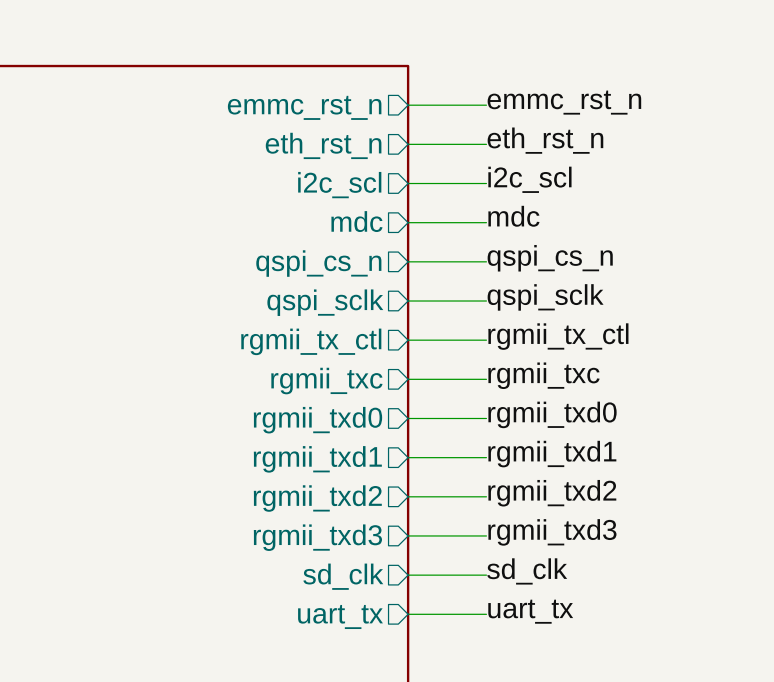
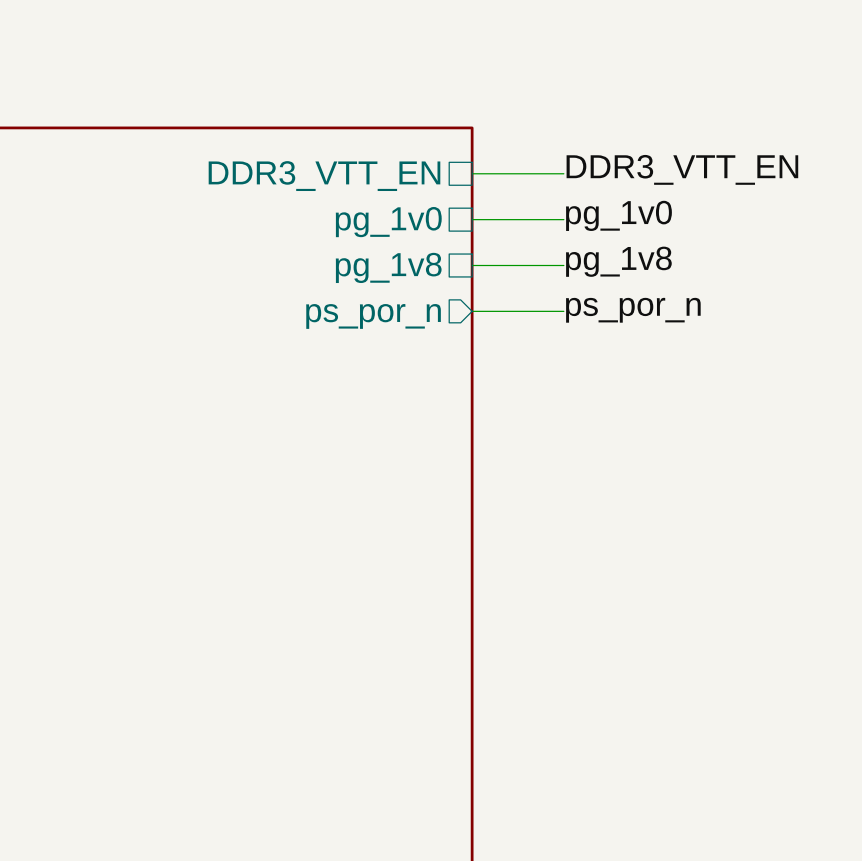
label: emmc_rst_n (564, 102) -> DDR3_VTT_EN (682, 169)
sheet pin shape: output (304, 107) -> passive (324, 176)
sheet pin: emmc_rst_n (304, 107) -> DDR3_VTT_EN (324, 176)
label: eth_rst_n (545, 140) -> pg_1v0 (618, 215)
sheet pin shape: output (323, 145) -> passive (388, 222)
sheet pin: eth_rst_n (323, 145) -> pg_1v0 (388, 222)
label: i2c_scl (529, 179) -> pg_1v8 (618, 261)
sheet pin shape: output (339, 185) -> passive (388, 267)
sheet pin: i2c_scl (339, 185) -> pg_1v8 (388, 267)
label: mdc (513, 216) -> ps_por_n (633, 310)
sheet pin: mdc (356, 221) -> ps_por_n (373, 316)
label: qspi_cs_n (550, 258) -> none
wire: (408, 261) (486, 261) -> none
sheet pin: qspi_cs_n (318, 263) -> none
label: qspi_sclk (545, 297) -> none
wire: (408, 301) (486, 301) -> none
sheet pin: qspi_sclk (325, 302) -> none
label: rgmii_tx_ctl (558, 336) -> none
wire: (408, 340) (486, 340) -> none
sheet pin: rgmii_tx_ctl (311, 341) -> none
label: rgmii_txc (543, 375) -> none
wire: (408, 379) (486, 379) -> none
sheet pin: rgmii_txc (326, 381) -> none
label: rgmii_txd0 (552, 414) -> none
wire: (408, 418) (486, 418) -> none
sheet pin: rgmii_txd0 (317, 420) -> none
label: rgmii_txd1 (552, 454) -> none
wire: (408, 457) (486, 457) -> none
sheet pin: rgmii_txd1 (317, 459) -> none
label: rgmii_txd2 (552, 493) -> none
wire: (408, 496) (486, 496) -> none
sheet pin: rgmii_txd2 (317, 498) -> none
label: rgmii_txd3 (552, 532) -> none
wire: (408, 535) (486, 535) -> none
sheet pin: rgmii_txd3 (317, 537) -> none
label: sd_clk (527, 571) -> none
wire: (408, 575) (486, 575) -> none
sheet pin: sd_clk (343, 576) -> none
label: uart_tx (530, 611) -> none
wire: (408, 614) (486, 614) -> none
sheet pin: uart_tx (340, 616) -> none

